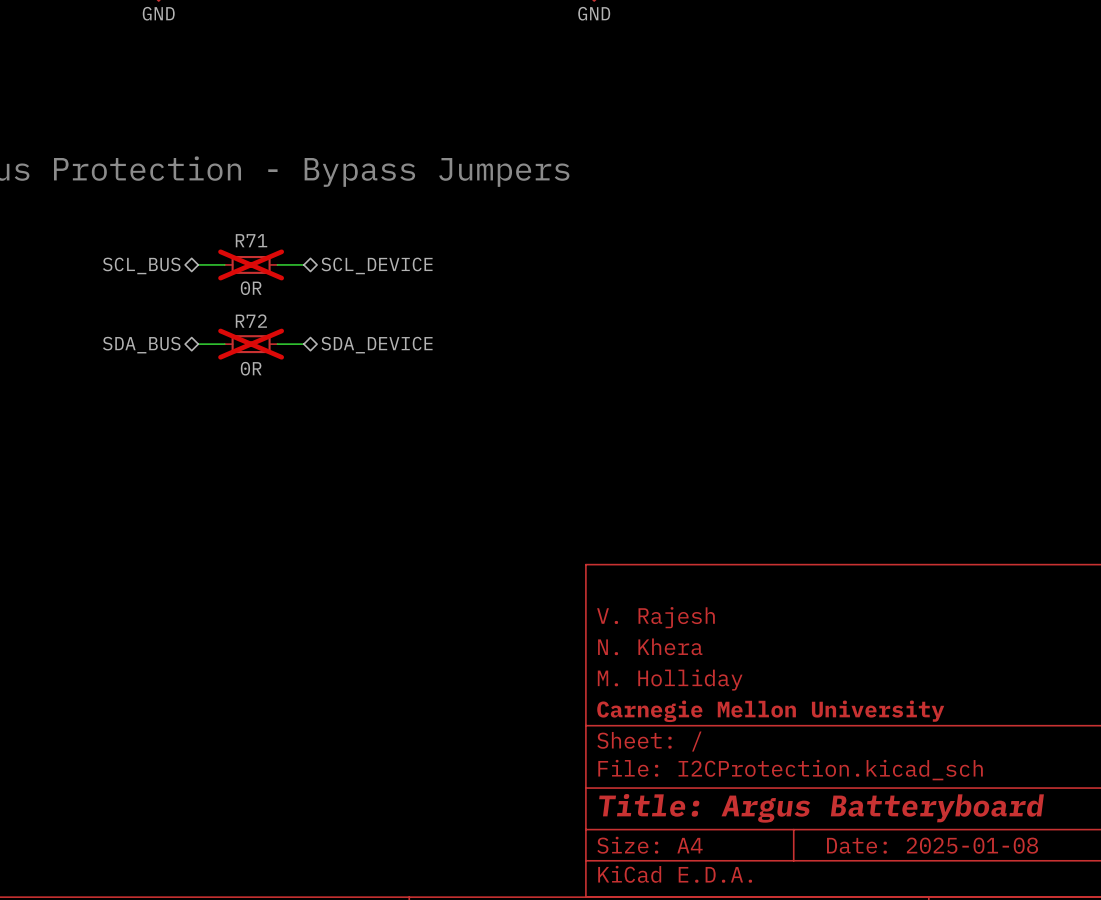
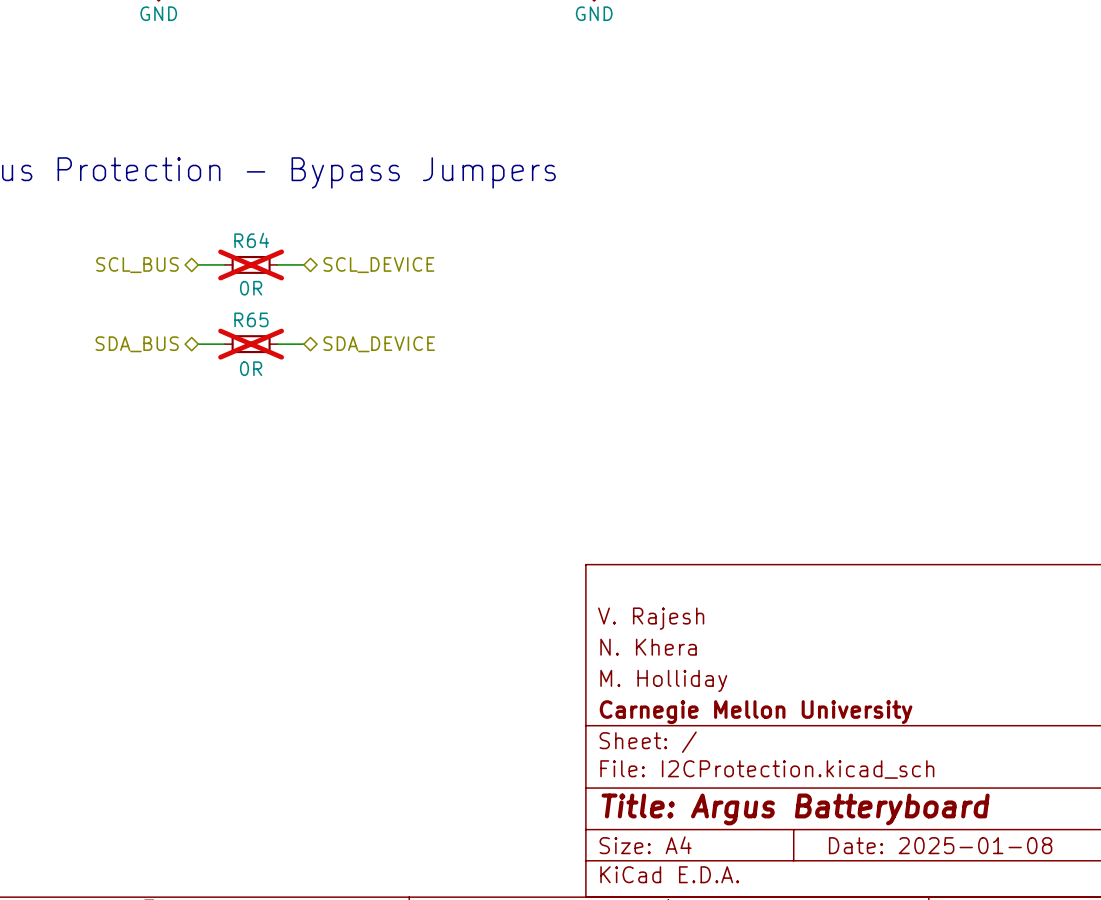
R71 name: R71 (251, 240) -> R64 (251, 240)
R72 name: R72 (251, 321) -> R65 (251, 319)

